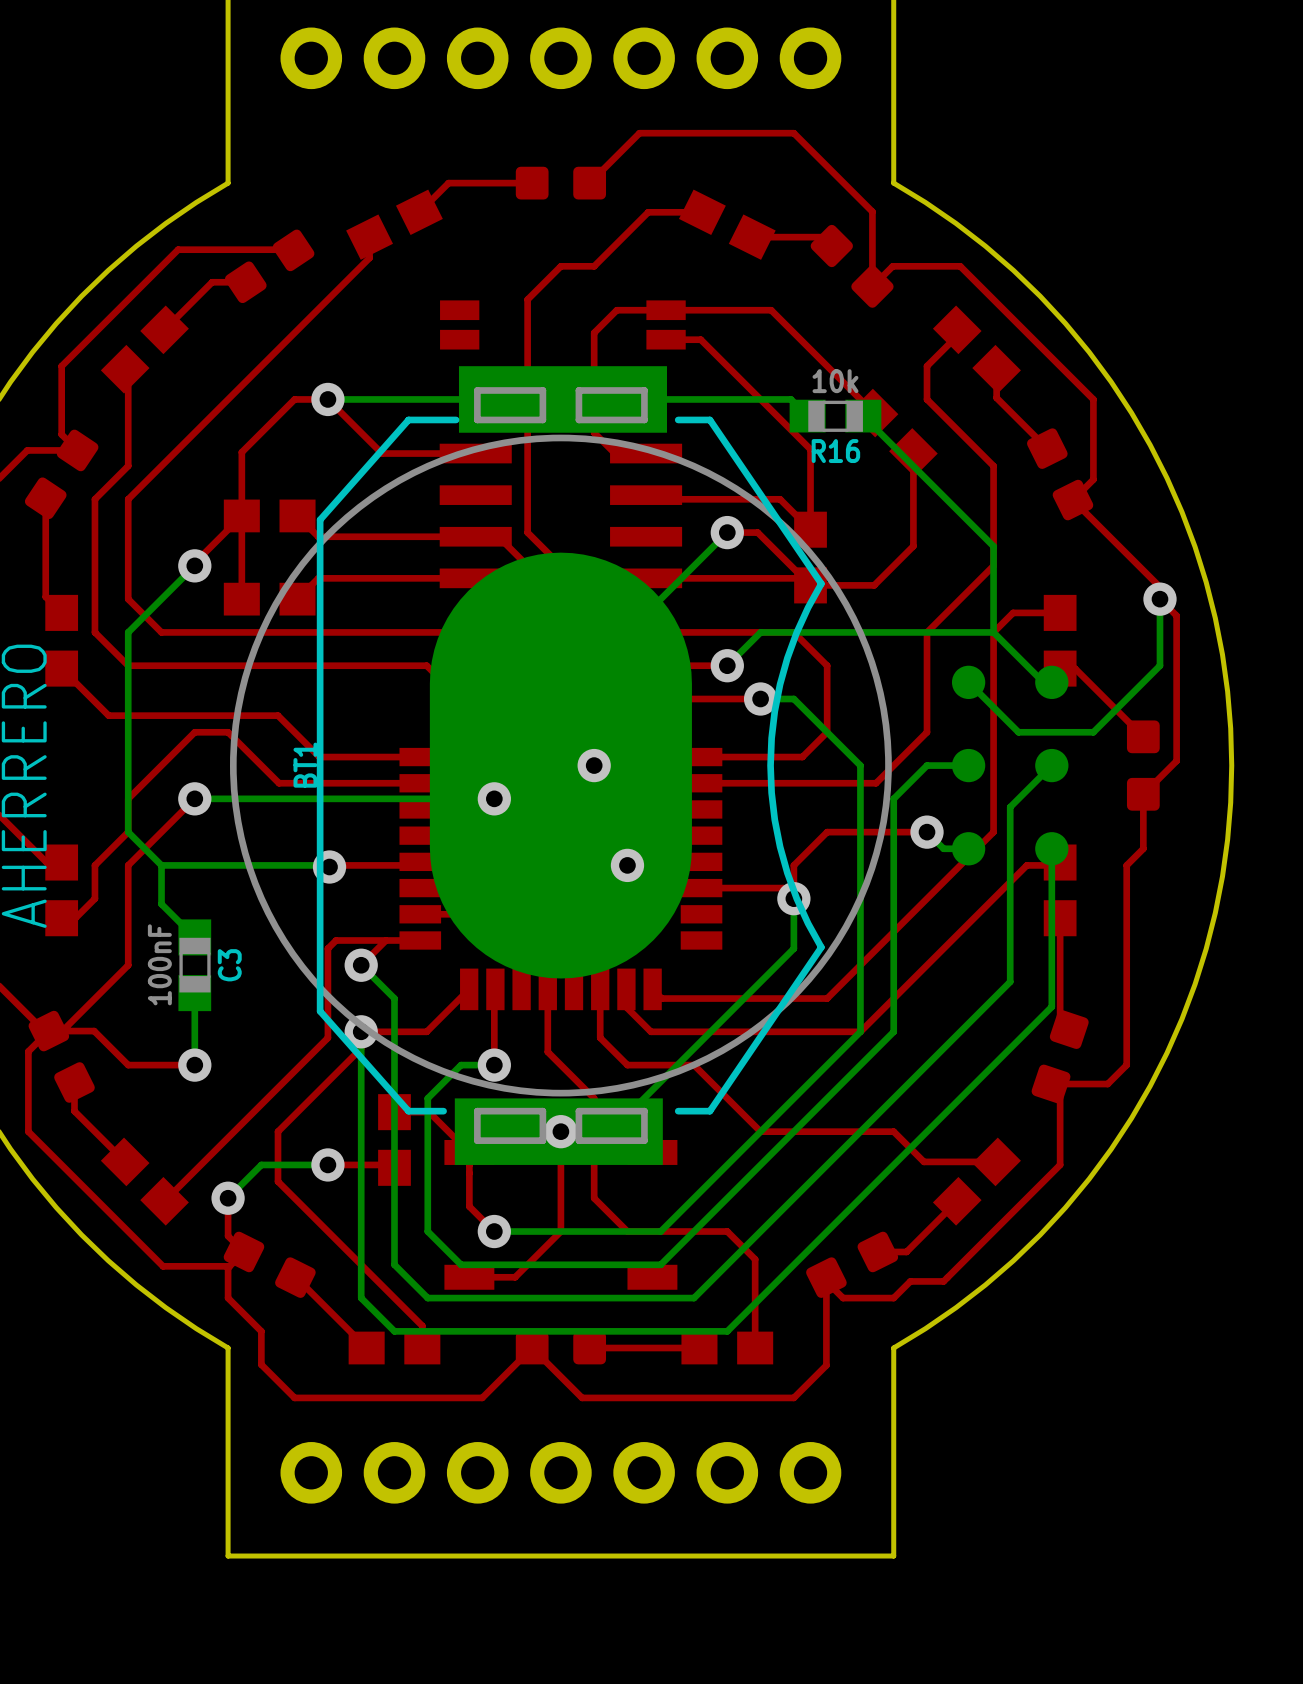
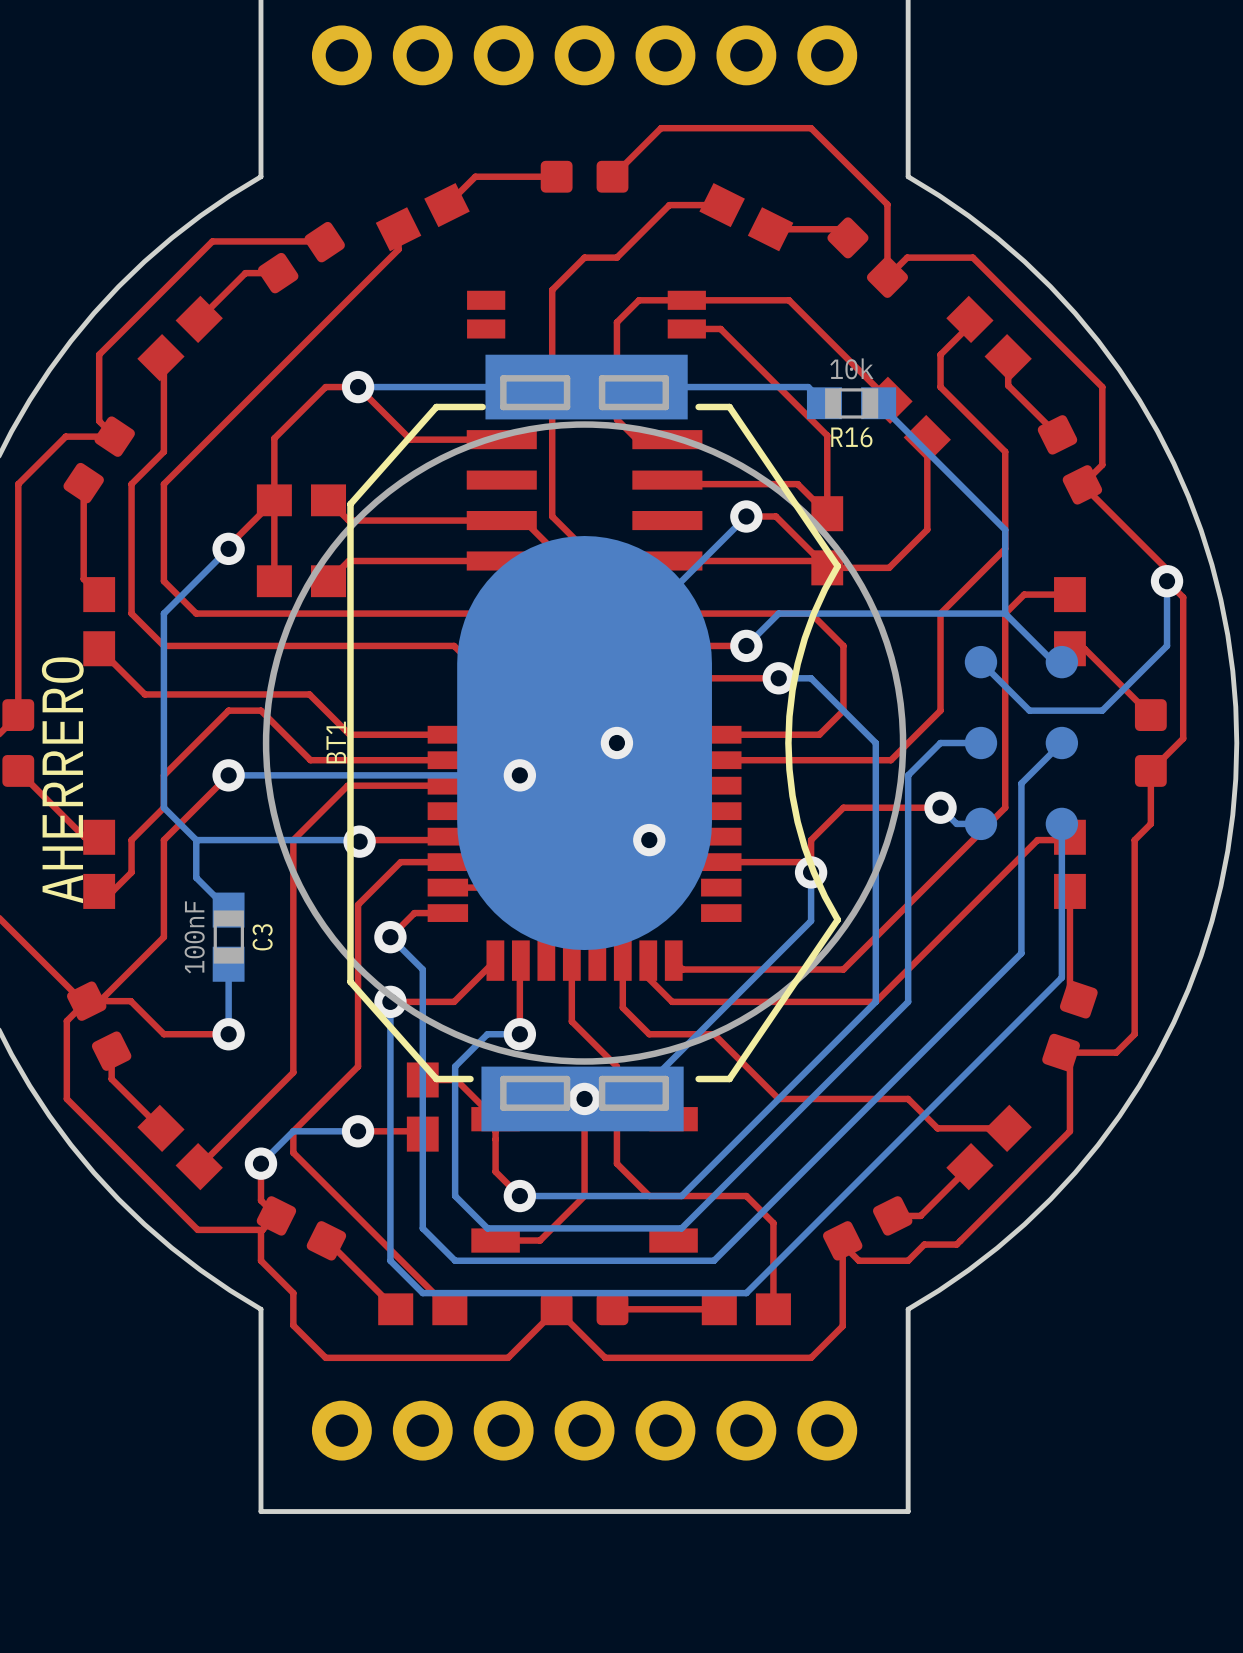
top track: (385, 940) (336, 940) (327, 948) -> (447, 862) (400, 862) (358, 904) (358, 920)
top track: (361, 1031) (361, 1048) (278, 1131) (278, 1181) (422, 1325) (422, 1348) -> (358, 1007) (358, 1066) (293, 1131) (293, 1152) (449, 1309)
top track: (327, 1037) (261, 1104) -> (447, 785) (347, 785) (293, 840) (293, 1072)

